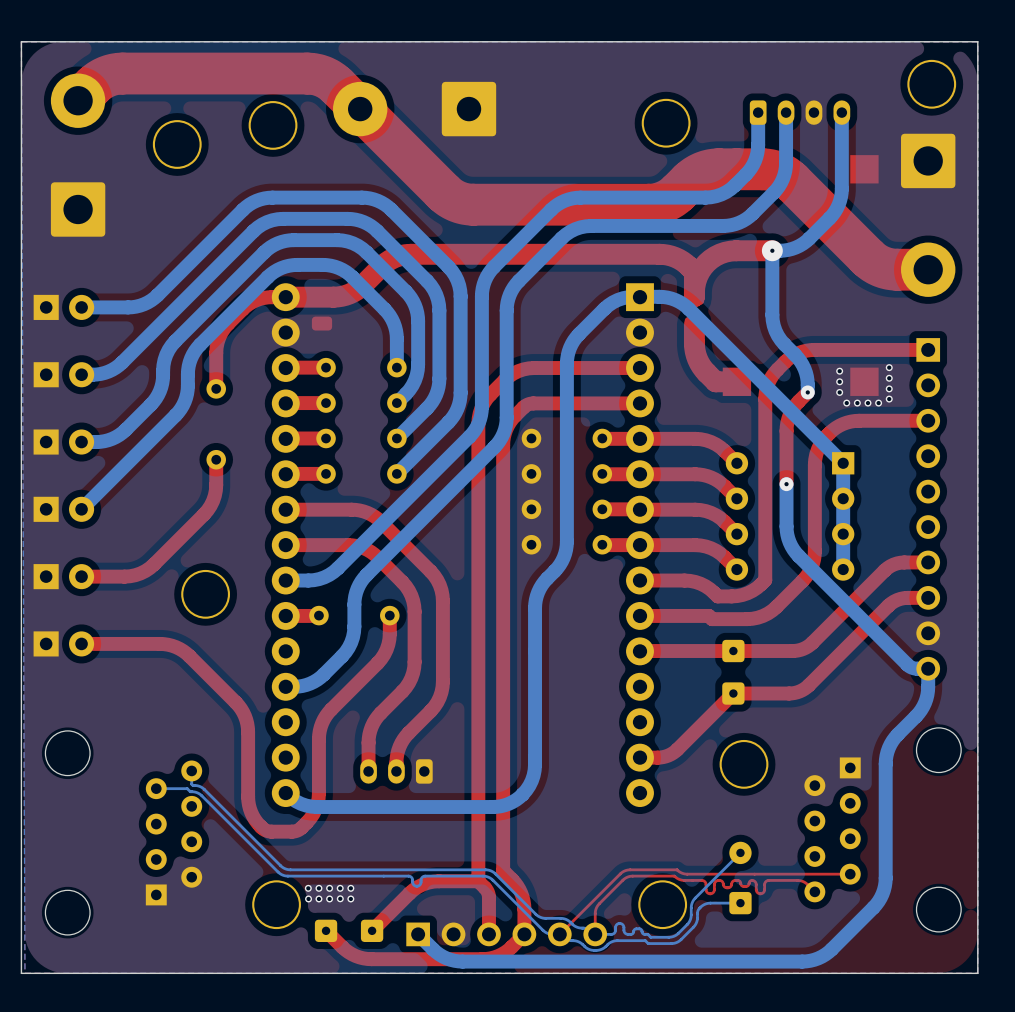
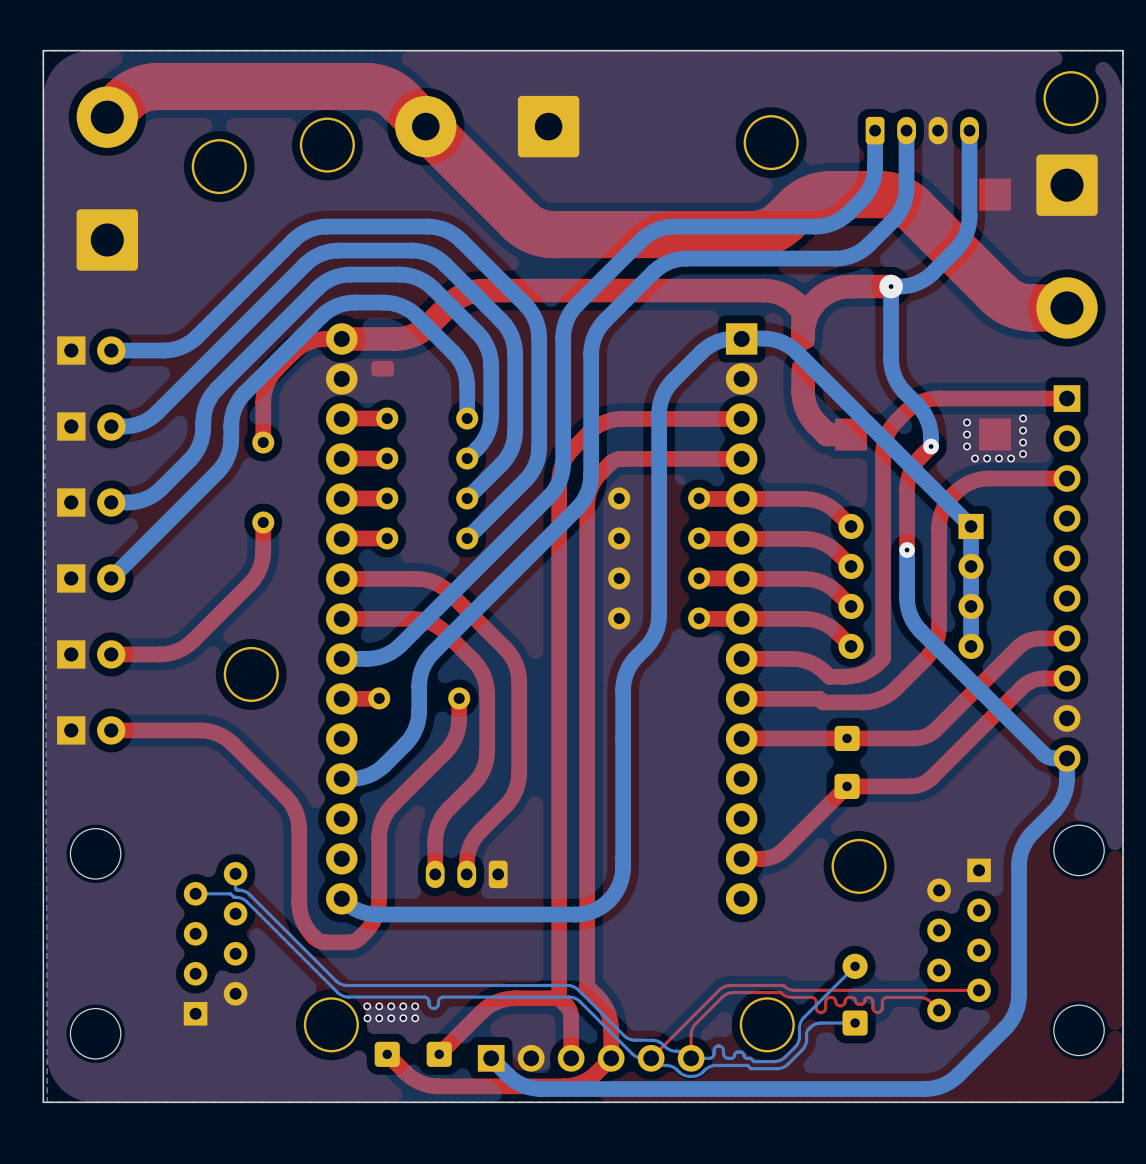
bottom track: (278, 872) (287, 876) (409, 876) (412, 878) (413, 884) (416, 886) (420, 884) (421, 878) (424, 876) (484, 876) (490, 878) (496, 884) -> (333, 987) (340, 994) (347, 997) (425, 997) (428, 999) (430, 1006) (433, 1008) (437, 1006) (439, 999) (443, 997) (568, 997) (580, 1001)

